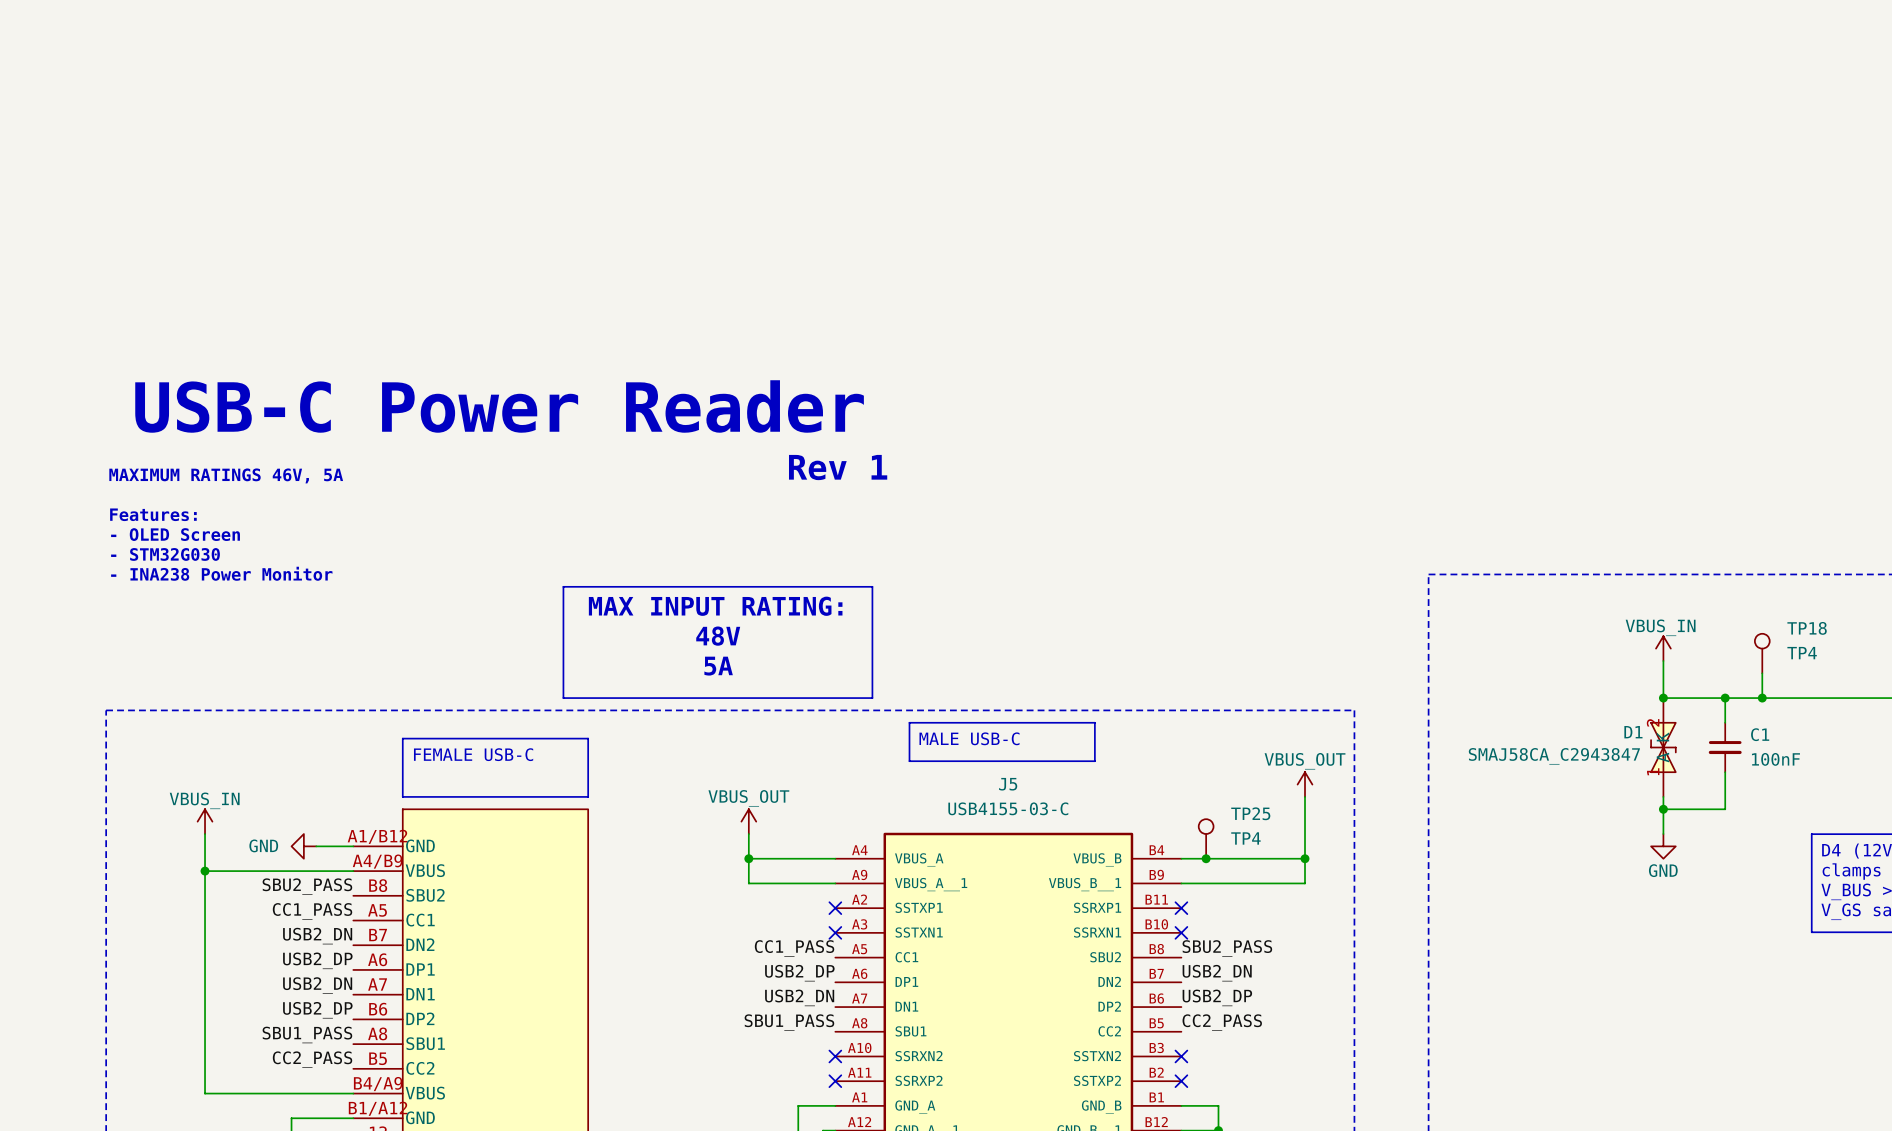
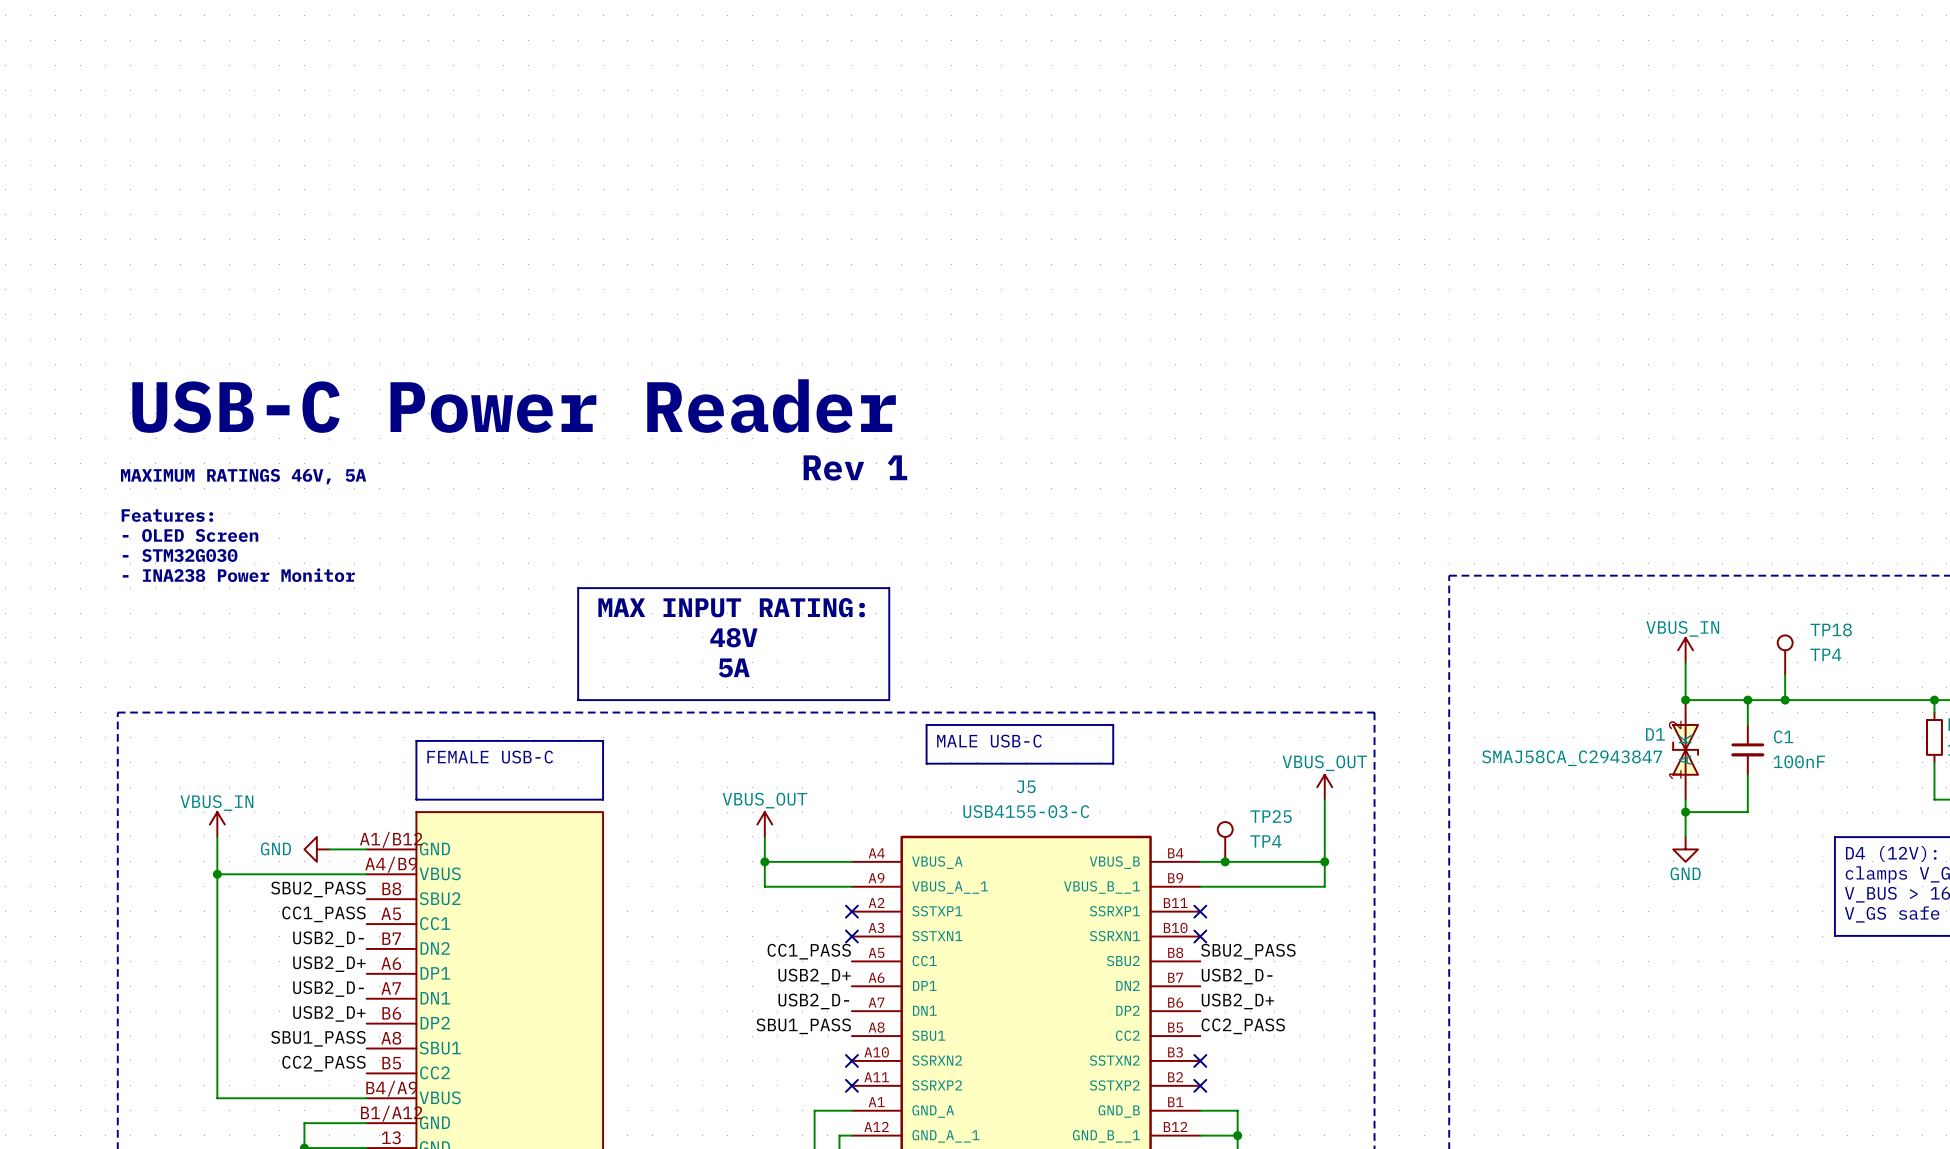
label: USB2_DN (317, 936) -> USB2_D- (328, 939)
label: USB2_DP (317, 960) -> USB2_D+ (329, 964)
label: USB2_DP (799, 973) -> USB2_D+ (814, 976)
label: USB2_DN (1217, 973) -> USB2_D- (1237, 976)
label: USB2_DN (317, 985) -> USB2_D- (328, 989)
label: USB2_DN (799, 997) -> USB2_D- (813, 1001)
label: USB2_DP (1217, 997) -> USB2_D+ (1237, 1001)
label: USB2_DP (317, 1010) -> USB2_D+ (329, 1013)

